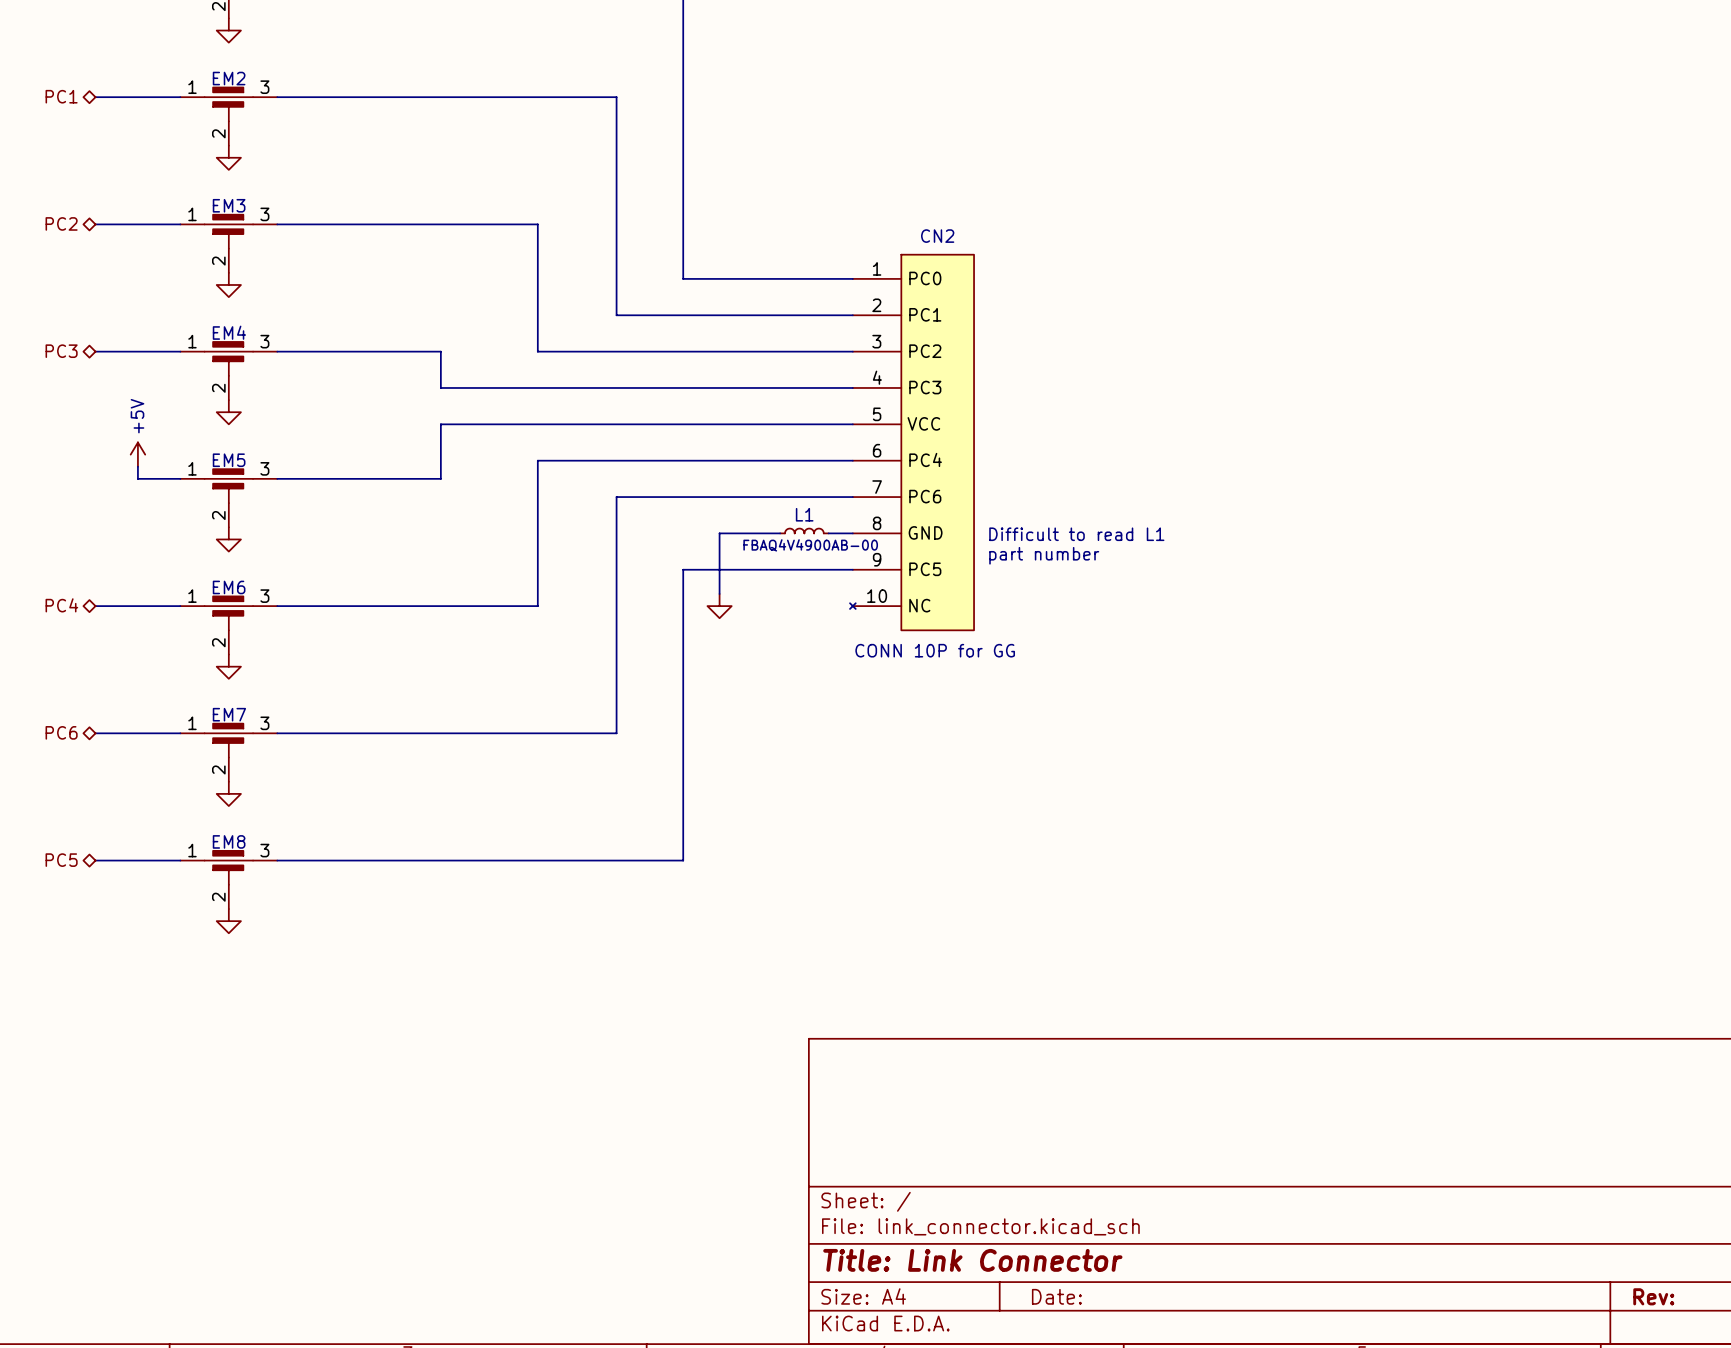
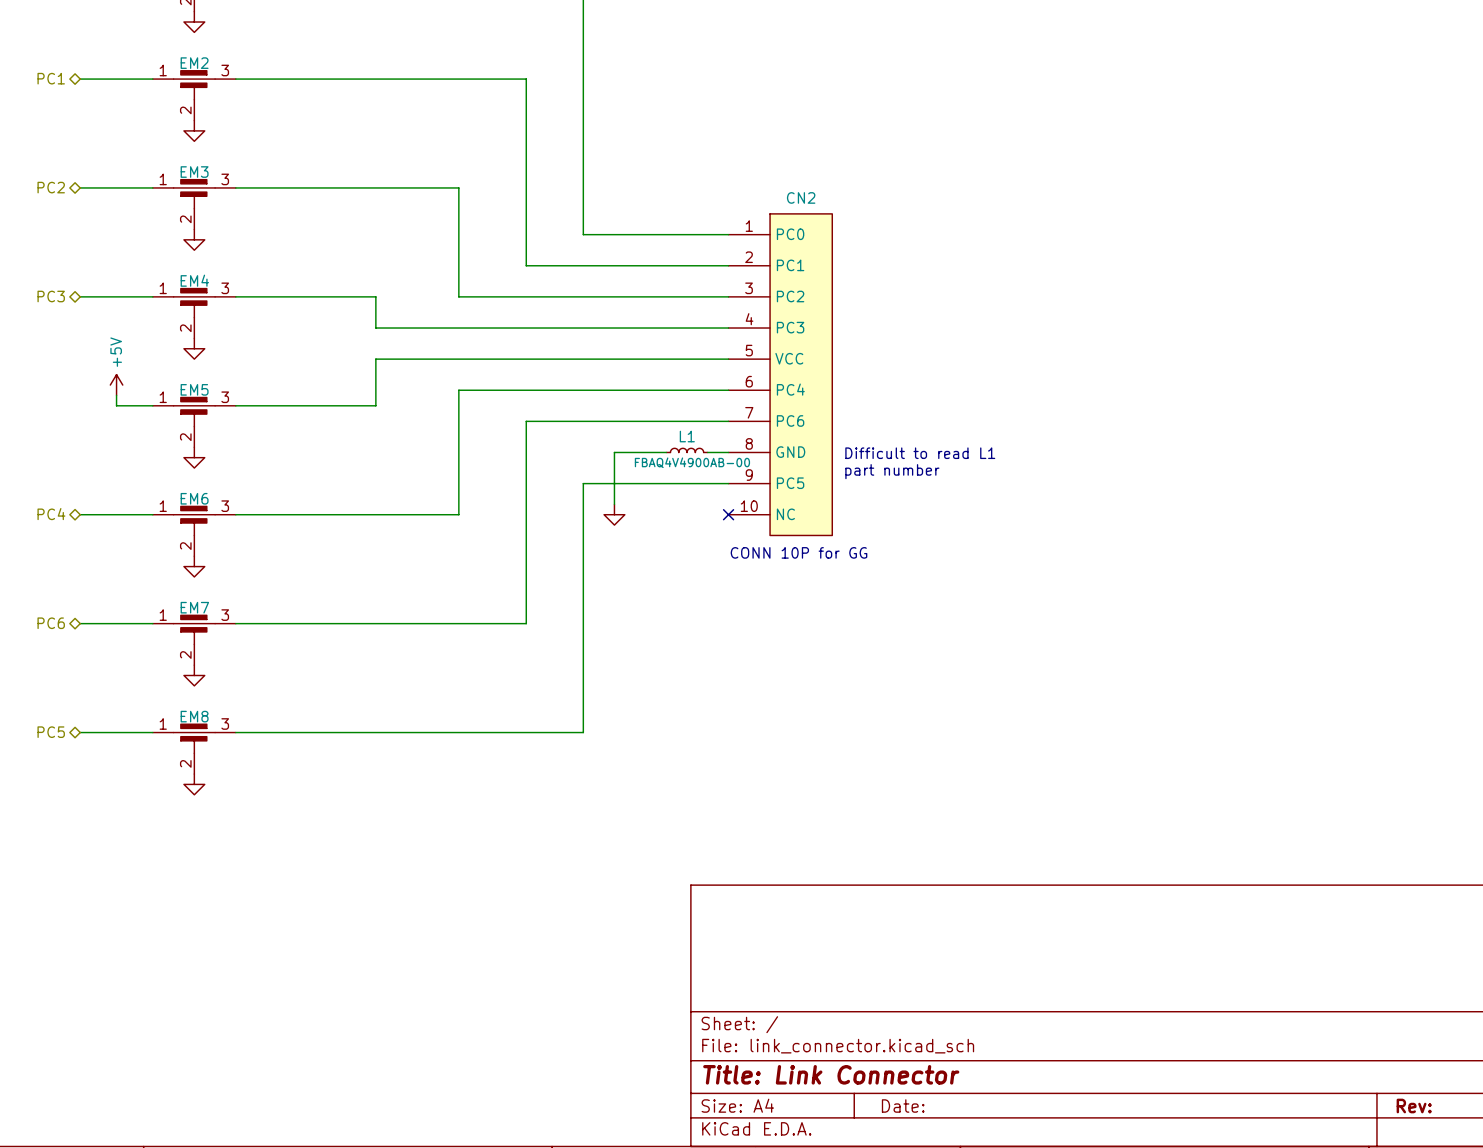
CN2 symbol: [850, 254, 975, 631] -> [728, 213, 833, 536]
no-connect mark: none -> (728, 514)

